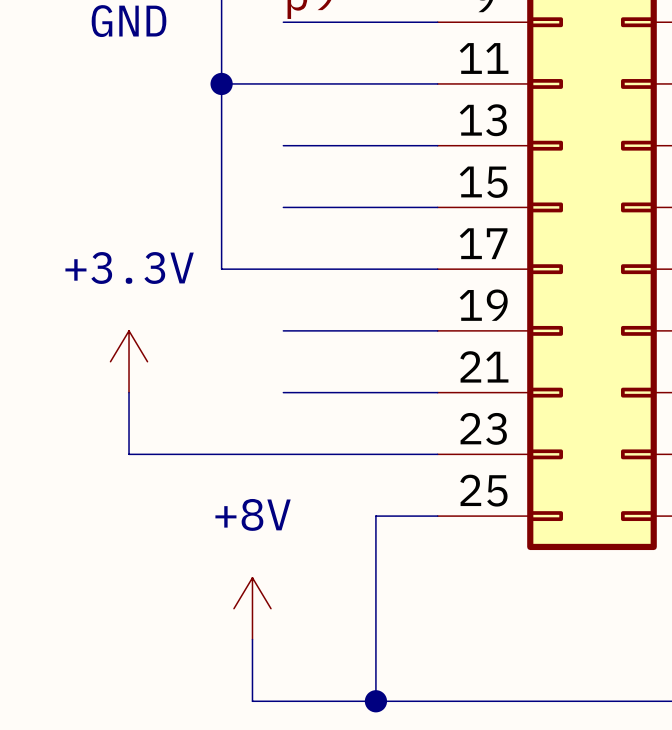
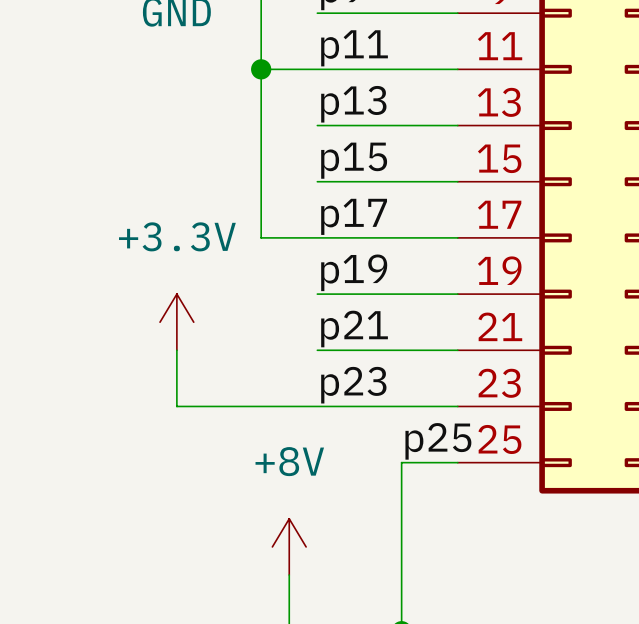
label: none -> p11 (354, 48)
label: none -> p13 (353, 104)
label: none -> p15 (354, 160)
label: none -> p17 (354, 216)
label: none -> p19 (354, 272)
label: none -> p21 (354, 328)
label: none -> p23 (353, 385)
label: none -> p25 (438, 441)

